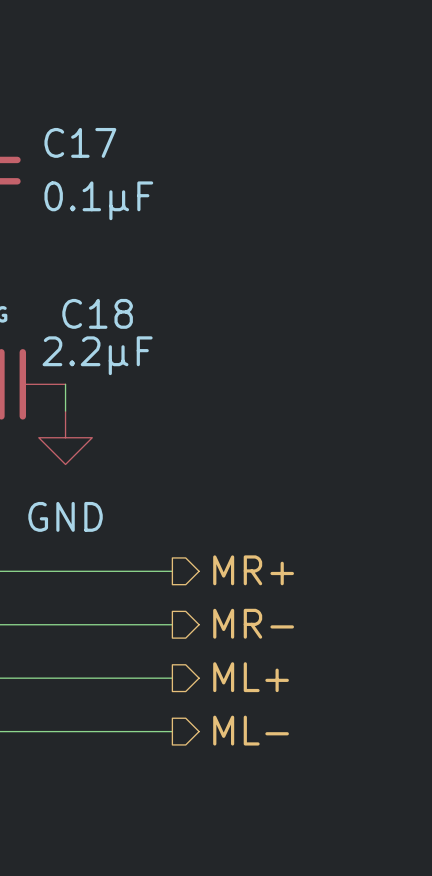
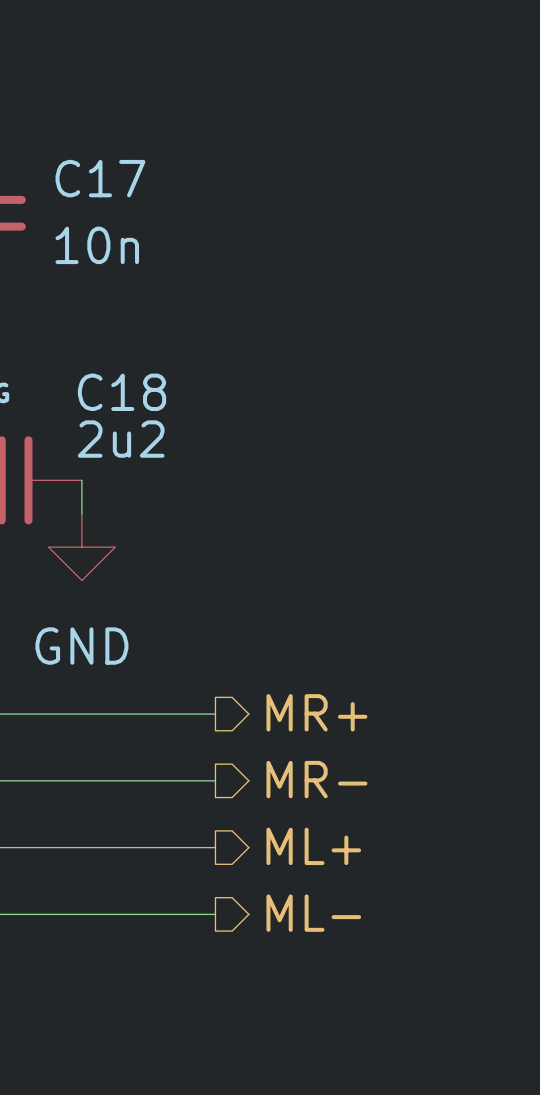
C17 value: 0.1µF (98, 200) -> 10n (97, 245)
C18 value: 2.2µF (97, 355) -> 2u2 (121, 439)

